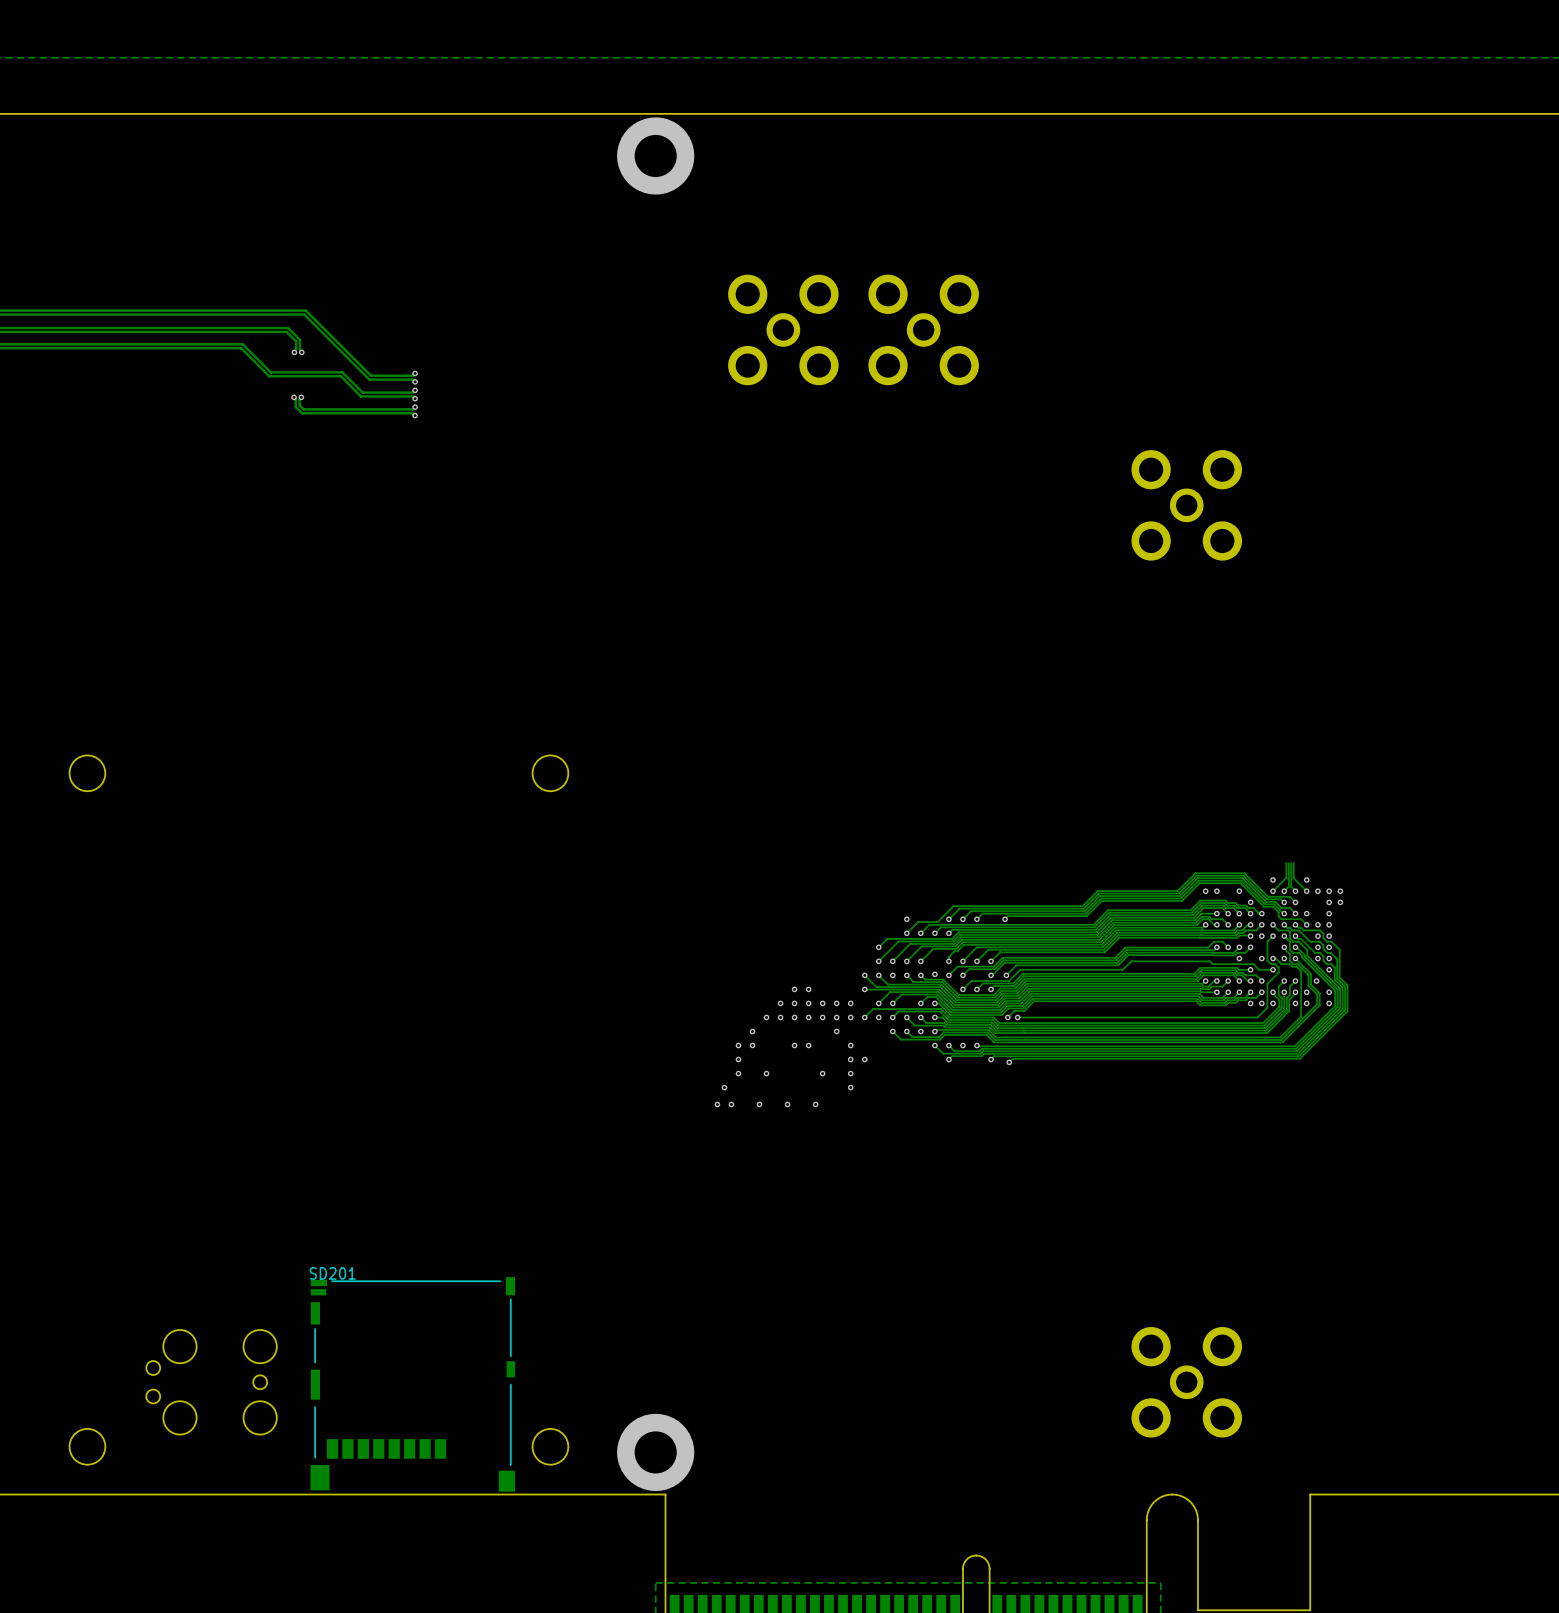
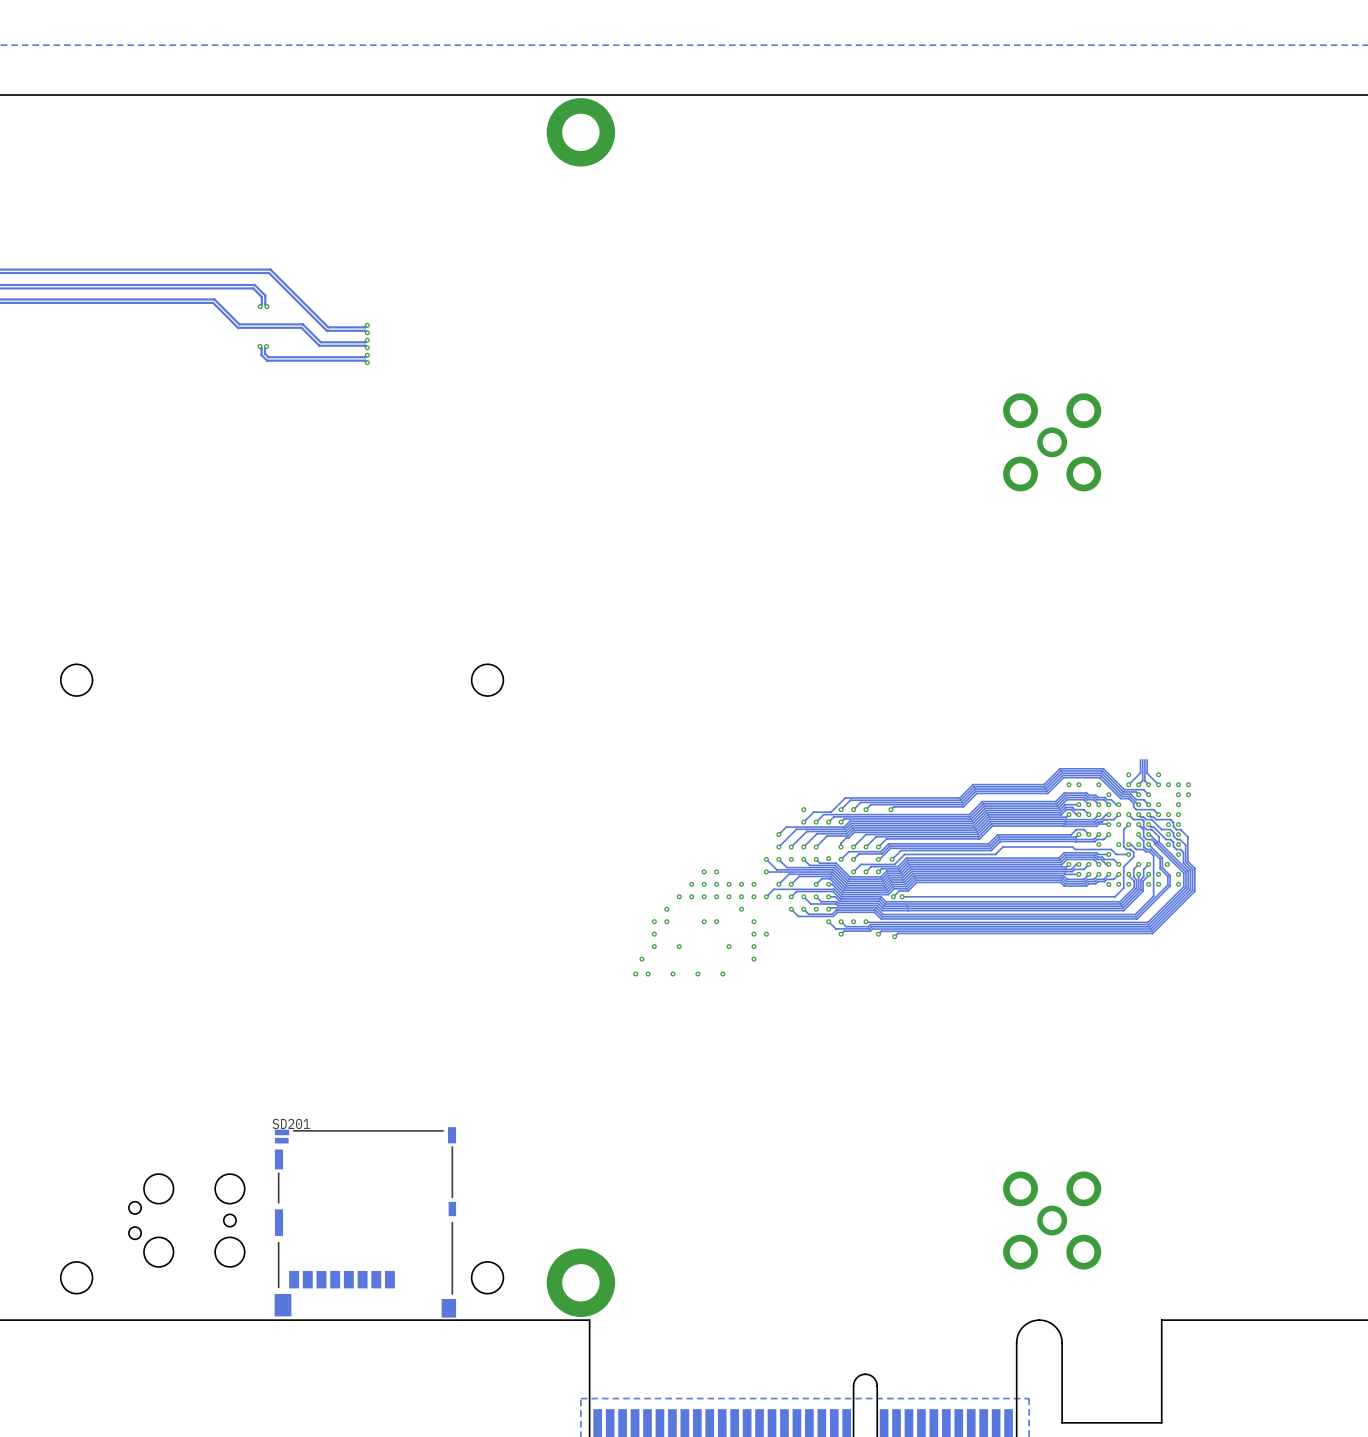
part: (783, 329) -> none
part: (923, 329) -> none

